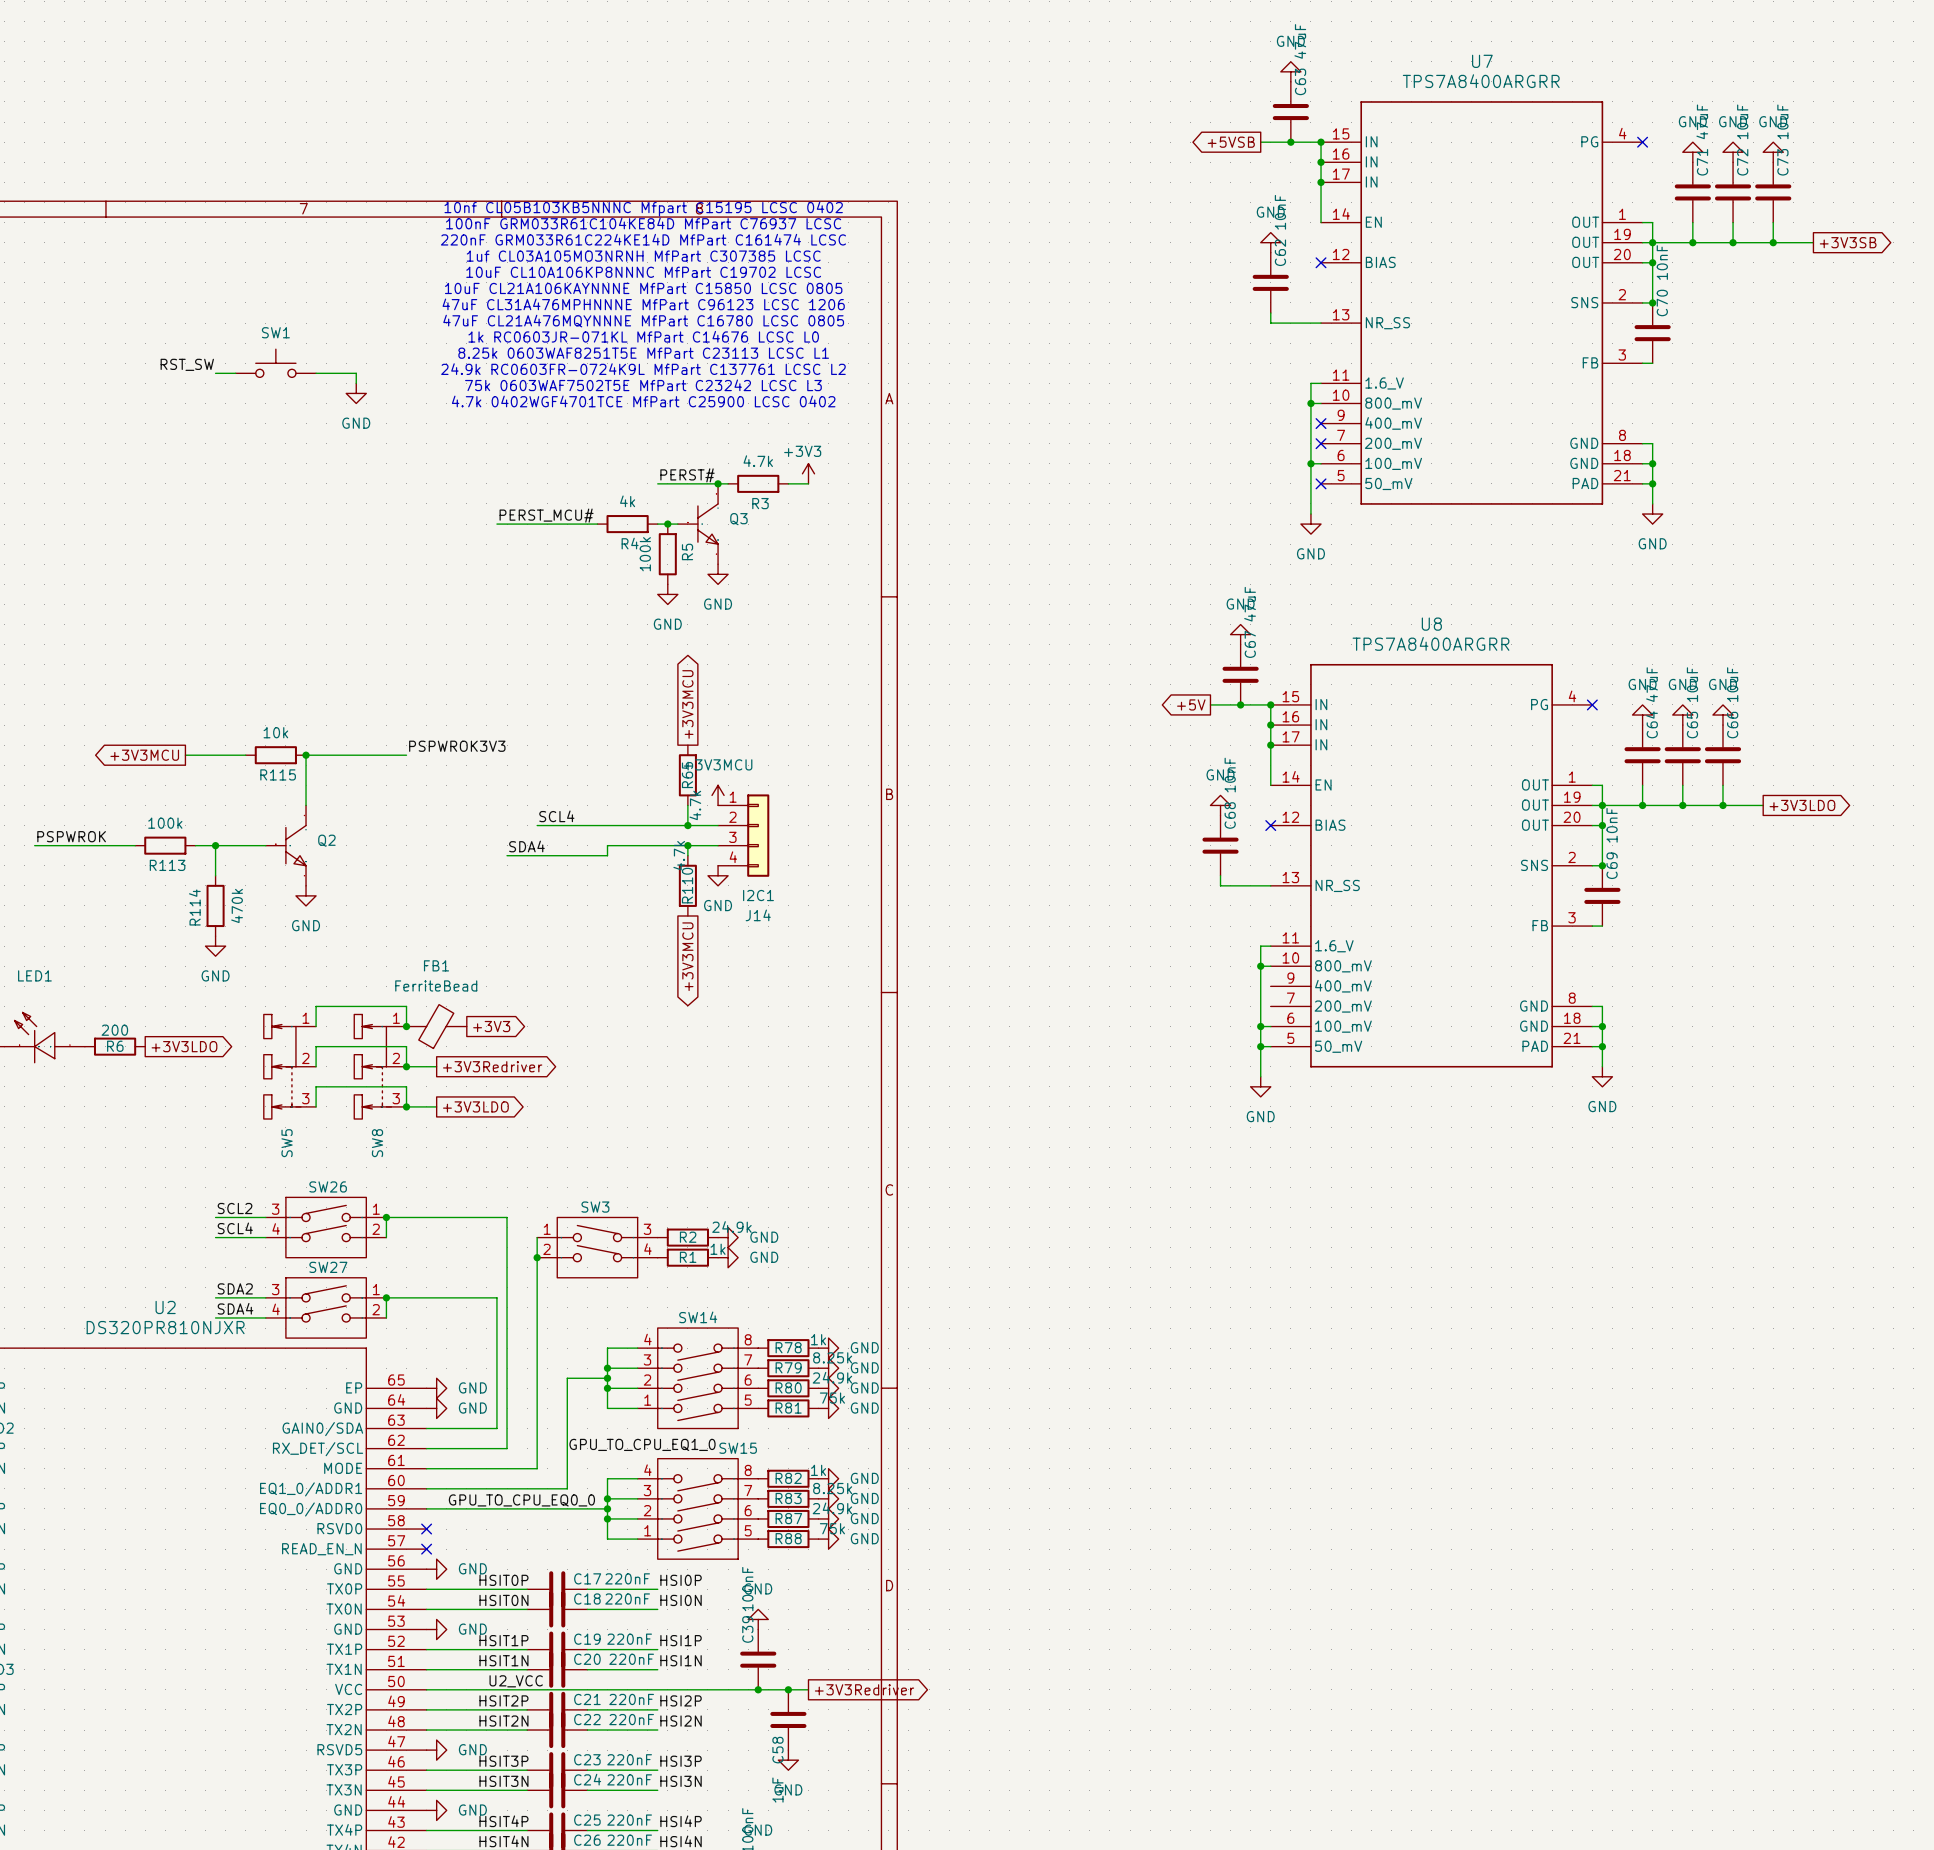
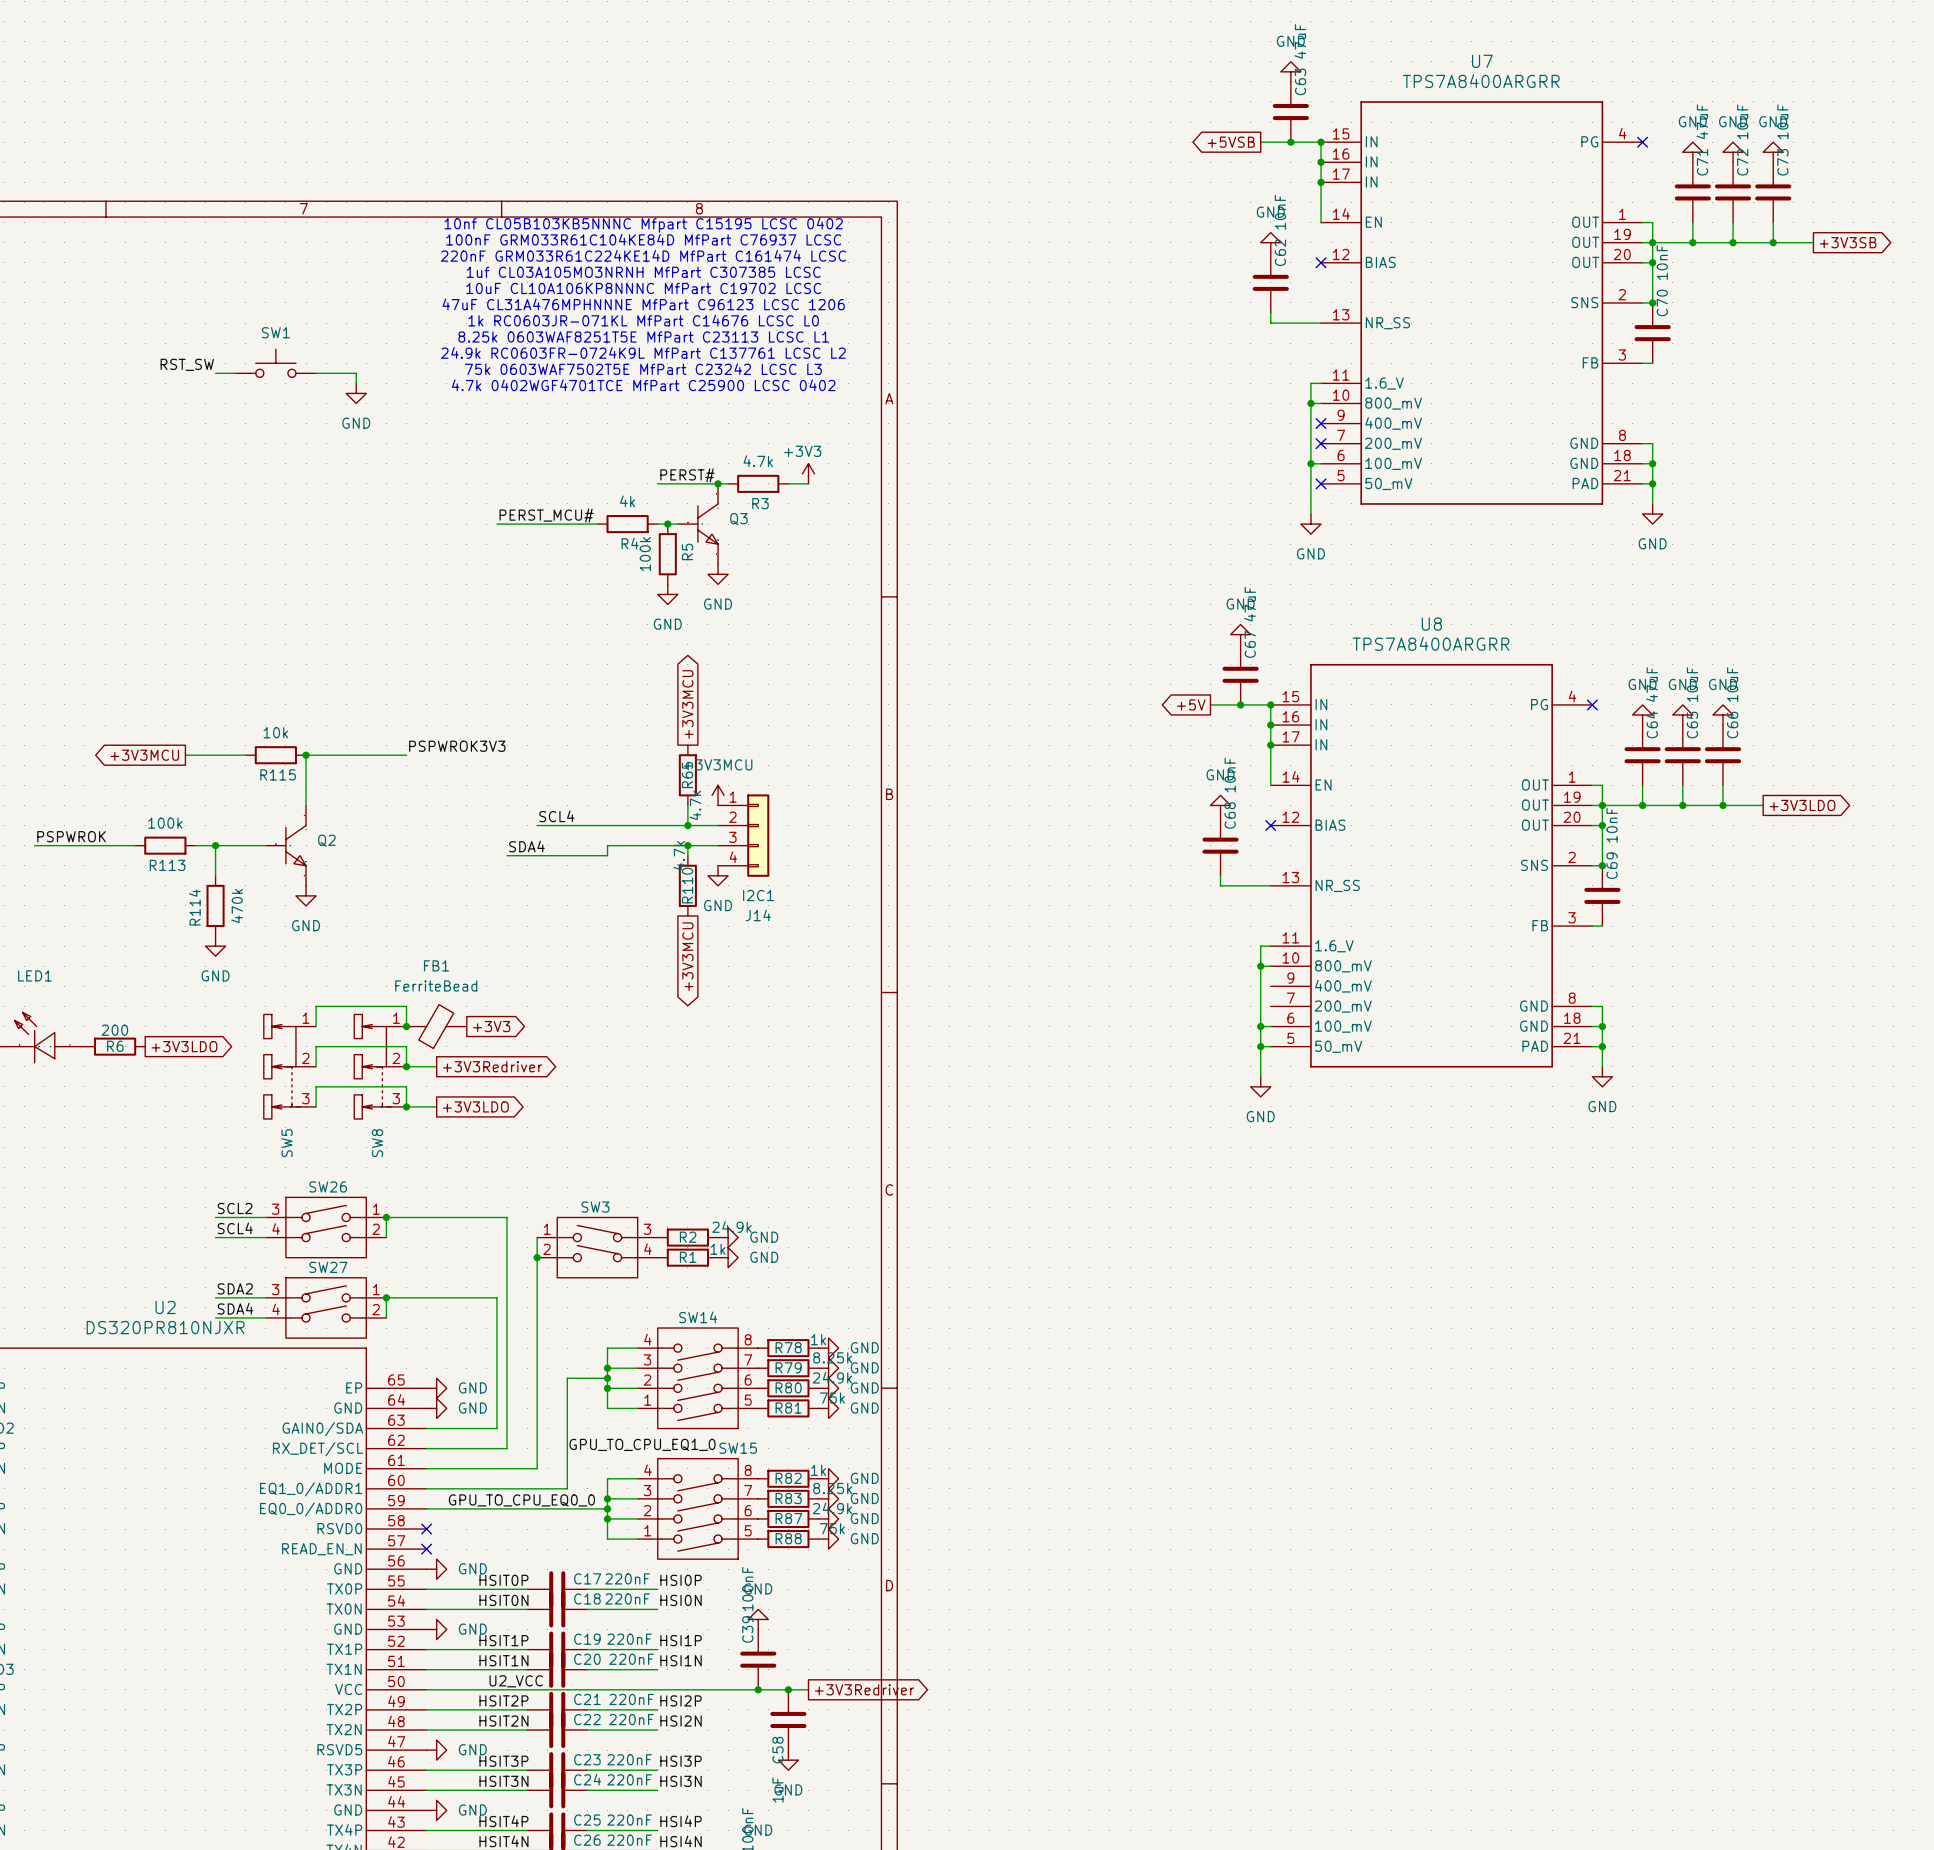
text: 10nf CL05B103KB5NNNC Mfpart C15195 LCSC 0402 (643, 209) -> none
text: 100nF GRM033R61C104KE84D MfPart C76937 LCSC (643, 223) -> 10nf CL05B103KB5NNNC Mfpart C15195 LCSC 0402 (643, 225)
text: 220nF GRM033R61C224KE14D MfPart C161474 LCSC (643, 239) -> 100nF GRM033R61C104KE84D MfPart C76937 LCSC (643, 239)
text: 1uf CL03A105MO3NRNH MfPart C307385 LCSC (643, 256) -> 220nF GRM033R61C224KE14D MfPart C161474 LCSC (643, 255)
text: 10uF CL10A106KP8NNNC MfPart C19702 LCSC (643, 272) -> 1uf CL03A105MO3NRNH MfPart C307385 LCSC (643, 272)
text: 10uF CL21A106KAYNNNE MfPart C15850 LCSC 0805 (643, 288) -> 10uF CL10A106KP8NNNC MfPart C19702 LCSC (643, 288)
text: 47uF CL21A476MQYNNNE MfPart C16780 LCSC 0805 (643, 321) -> 1k RC0603JR-071KL MfPart C14676 LCSC L0 (643, 320)
text: 1k RC0603JR-071KL MfPart C14676 LCSC L0 (643, 336) -> 8.25k 0603WAF8251T5E MfPart C23113 LCSC L1 (643, 337)
text: 8.25k 0603WAF8251T5E MfPart C23113 LCSC L1 (643, 353) -> 24.9k RC0603FR-0724K9L MfPart C137761 LCSC L2 (643, 352)
text: 24.9k RC0603FR-0724K9L MfPart C137761 LCSC L2 (643, 369) -> 75k 0603WAF7502T5E MfPart C23242 LCSC L3 (643, 369)
text: 75k 0603WAF7502T5E MfPart C23242 LCSC L3 (643, 385) -> 4.7k 0402WGF4701TCE MfPart C25900 LCSC 0402 (643, 385)
text: 4.7k 0402WGF4701TCE MfPart C25900 LCSC 0402 (643, 401) -> none

